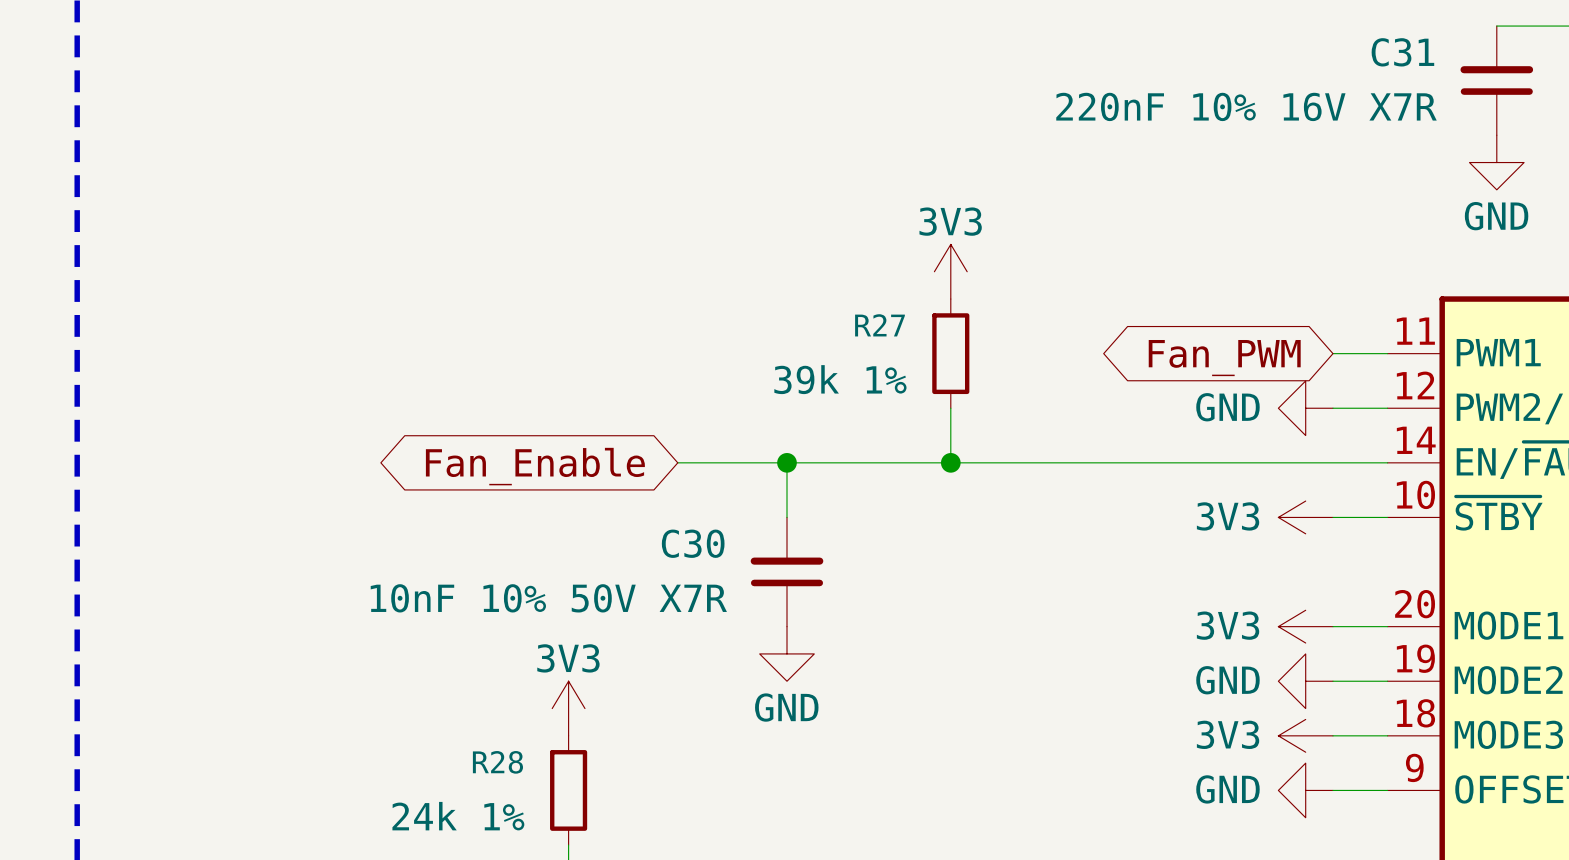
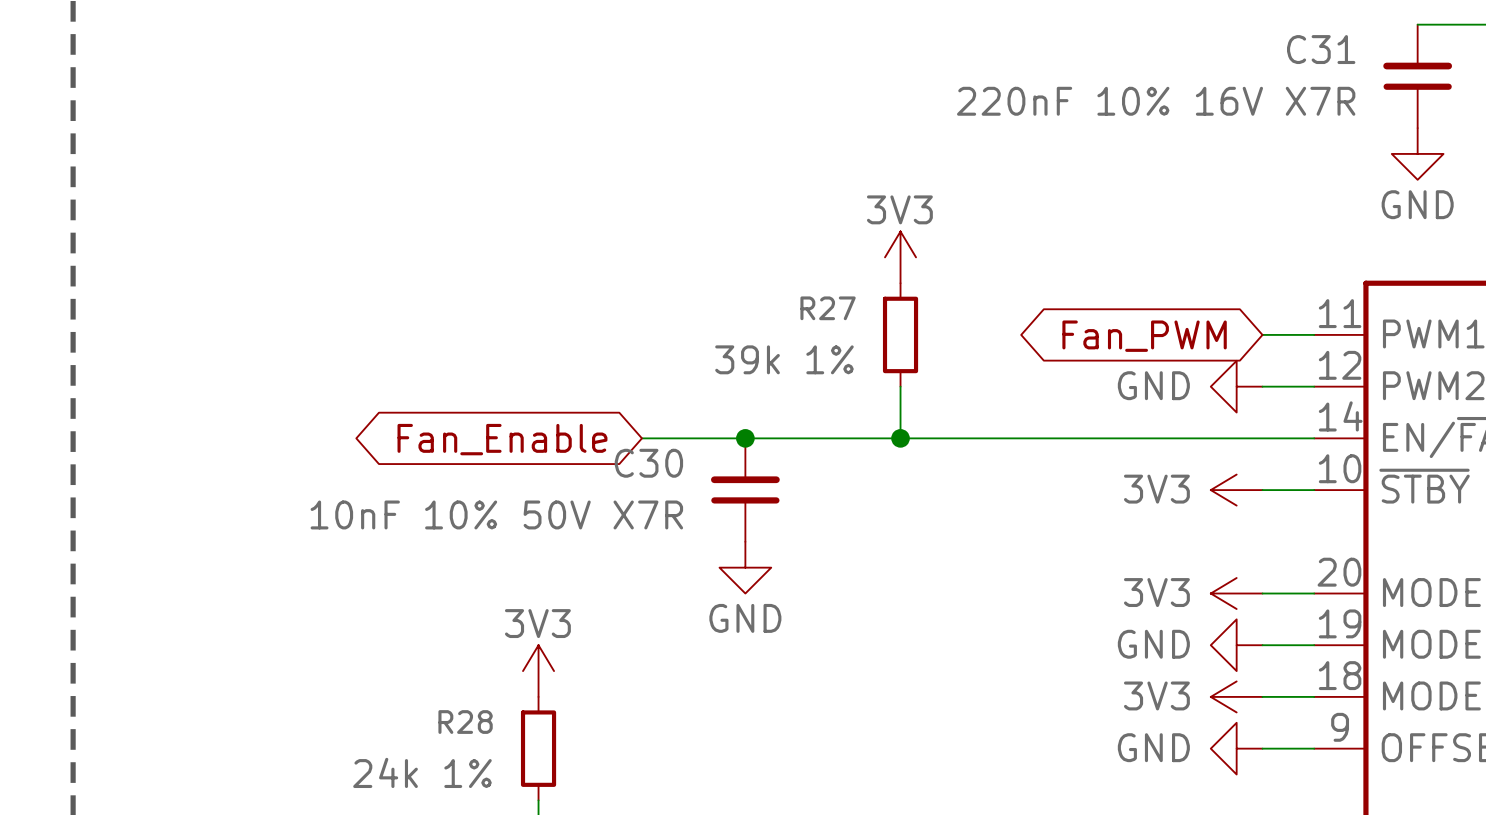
C30 position: (786, 572) -> (745, 490)
power symbol position: GND (786, 653) -> GND (745, 567)

